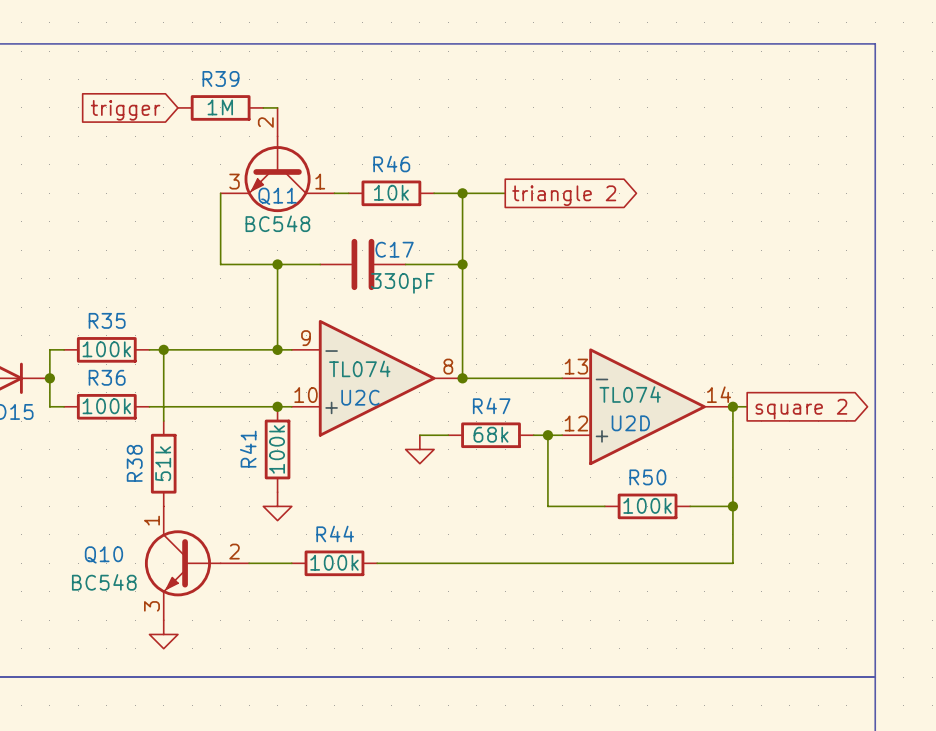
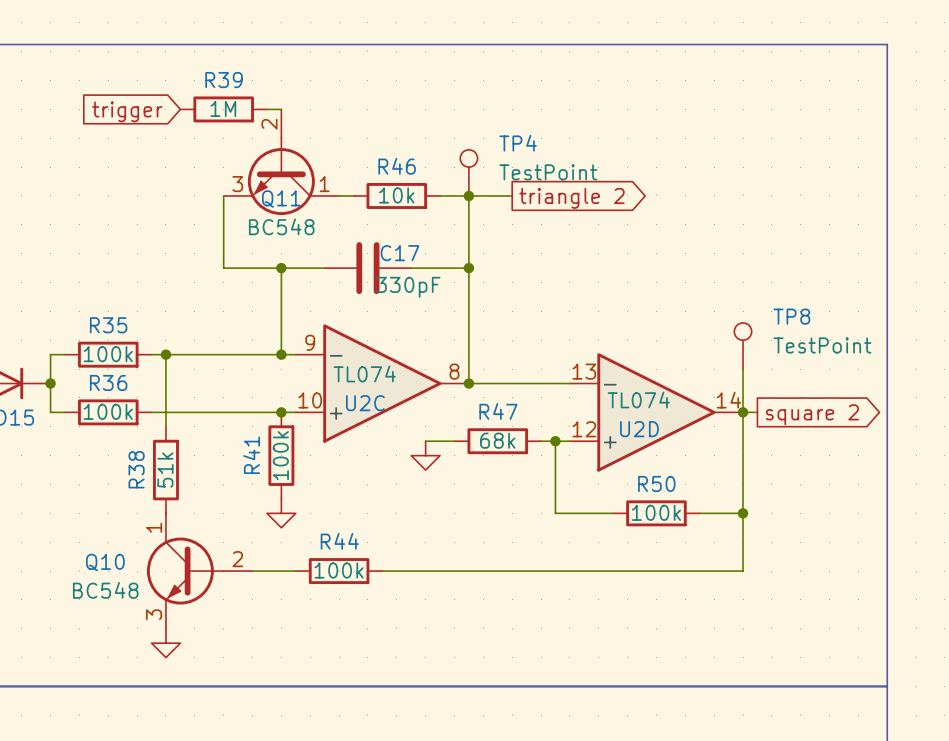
TP4: none -> TestPoint (468, 172)
TP8: none -> TestPoint (743, 346)
wire: none -> (743, 369) (743, 412)

